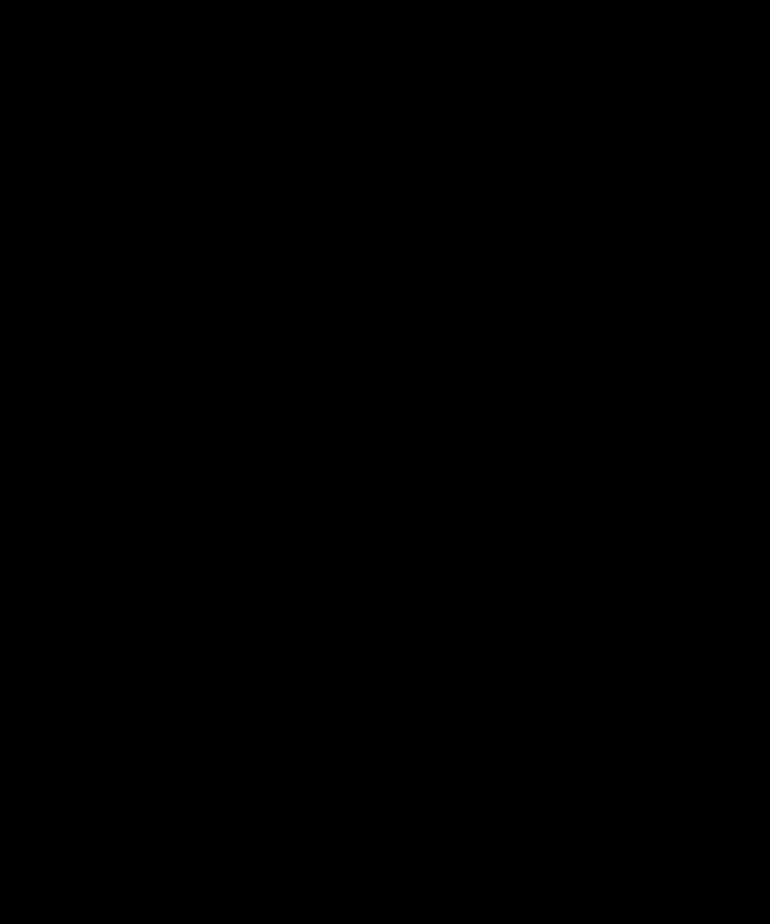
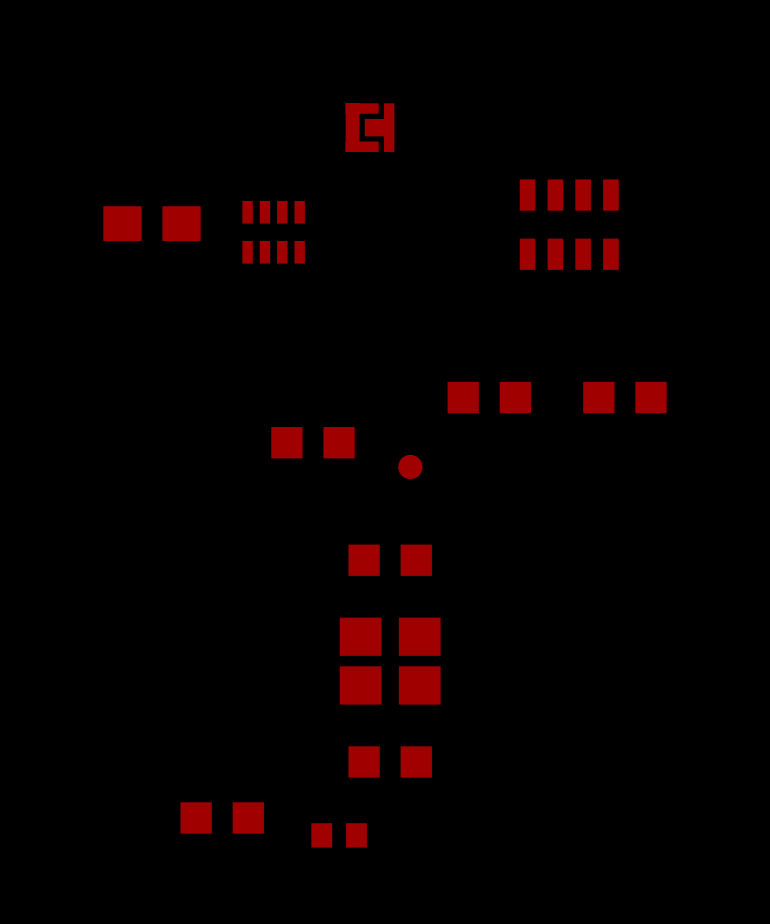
part: none -> (369, 127)
part: none -> (151, 223)
part: none -> (569, 224)
part: none -> (273, 232)
part: none -> (489, 397)
part: none -> (624, 397)
part: none -> (312, 442)
part: none -> (410, 467)
part: none -> (390, 560)
part: none -> (390, 661)
part: none -> (390, 761)
part: none -> (222, 817)
part: none -> (339, 835)

